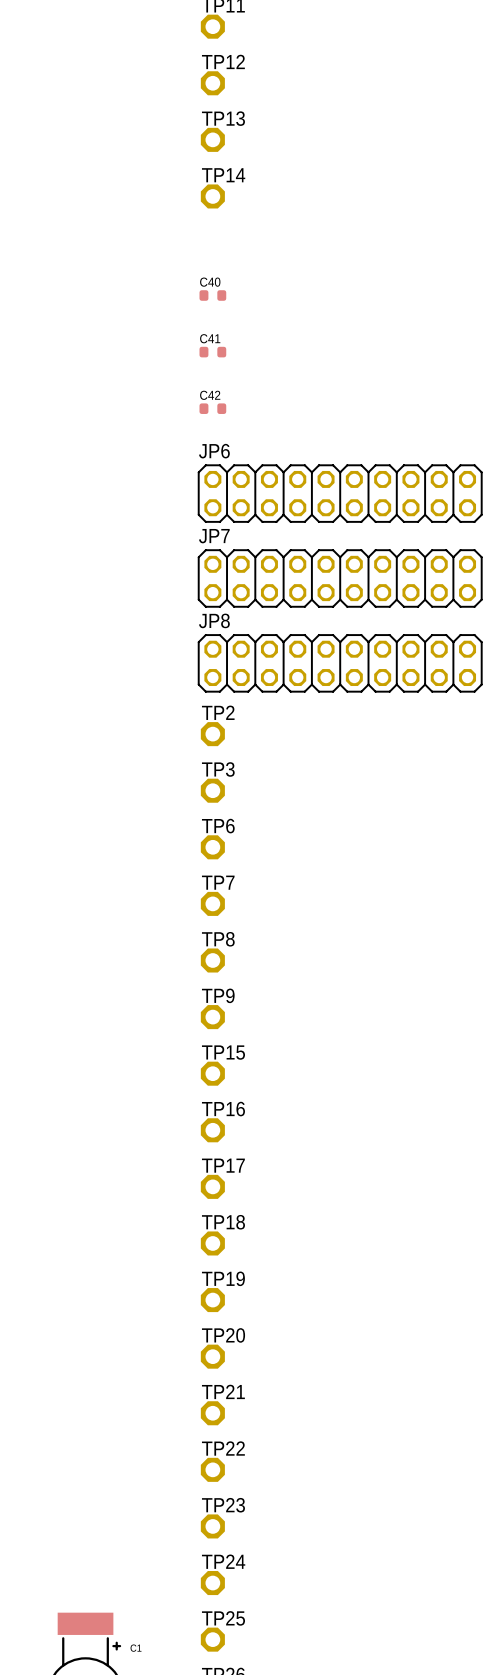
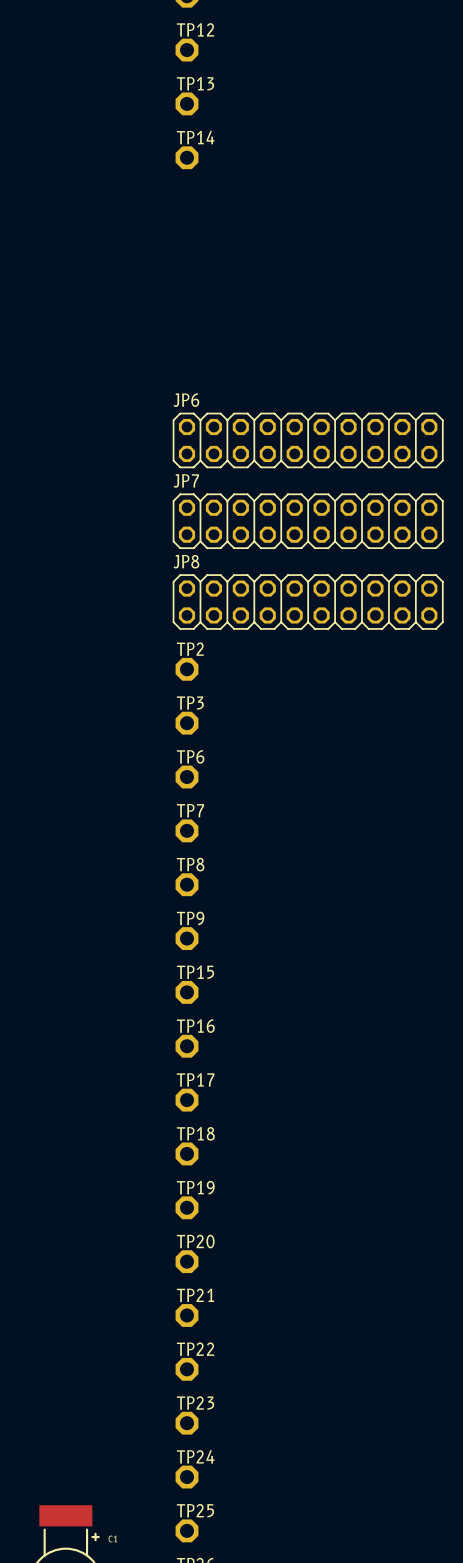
C40: (212, 295) -> none
C41: (212, 352) -> none
C42: (212, 408) -> none

